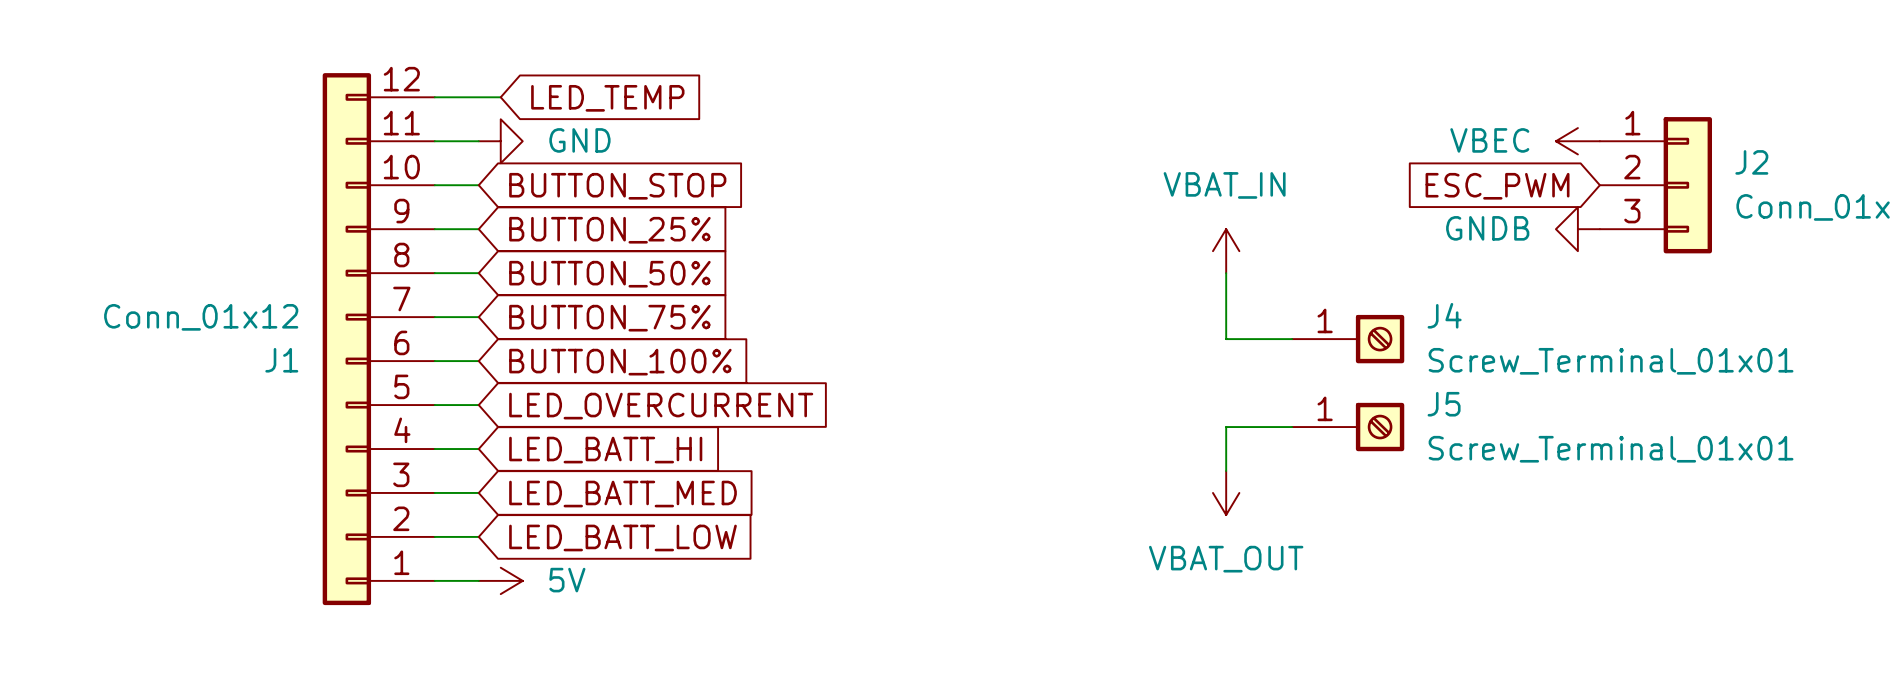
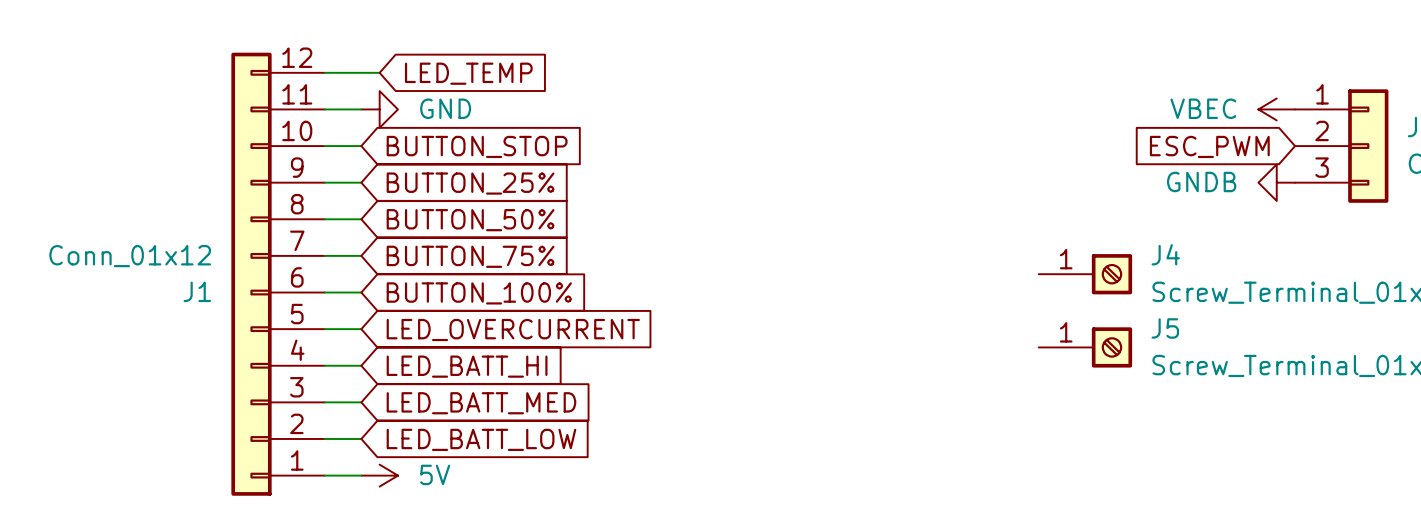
power symbol: VBAT_IN (1226, 251) -> none
wire: (1226, 273) (1226, 339) (1292, 339) -> none
wire: (1292, 427) (1226, 427) (1226, 470) -> none
power symbol: VBAT_OUT (1226, 492) -> none

